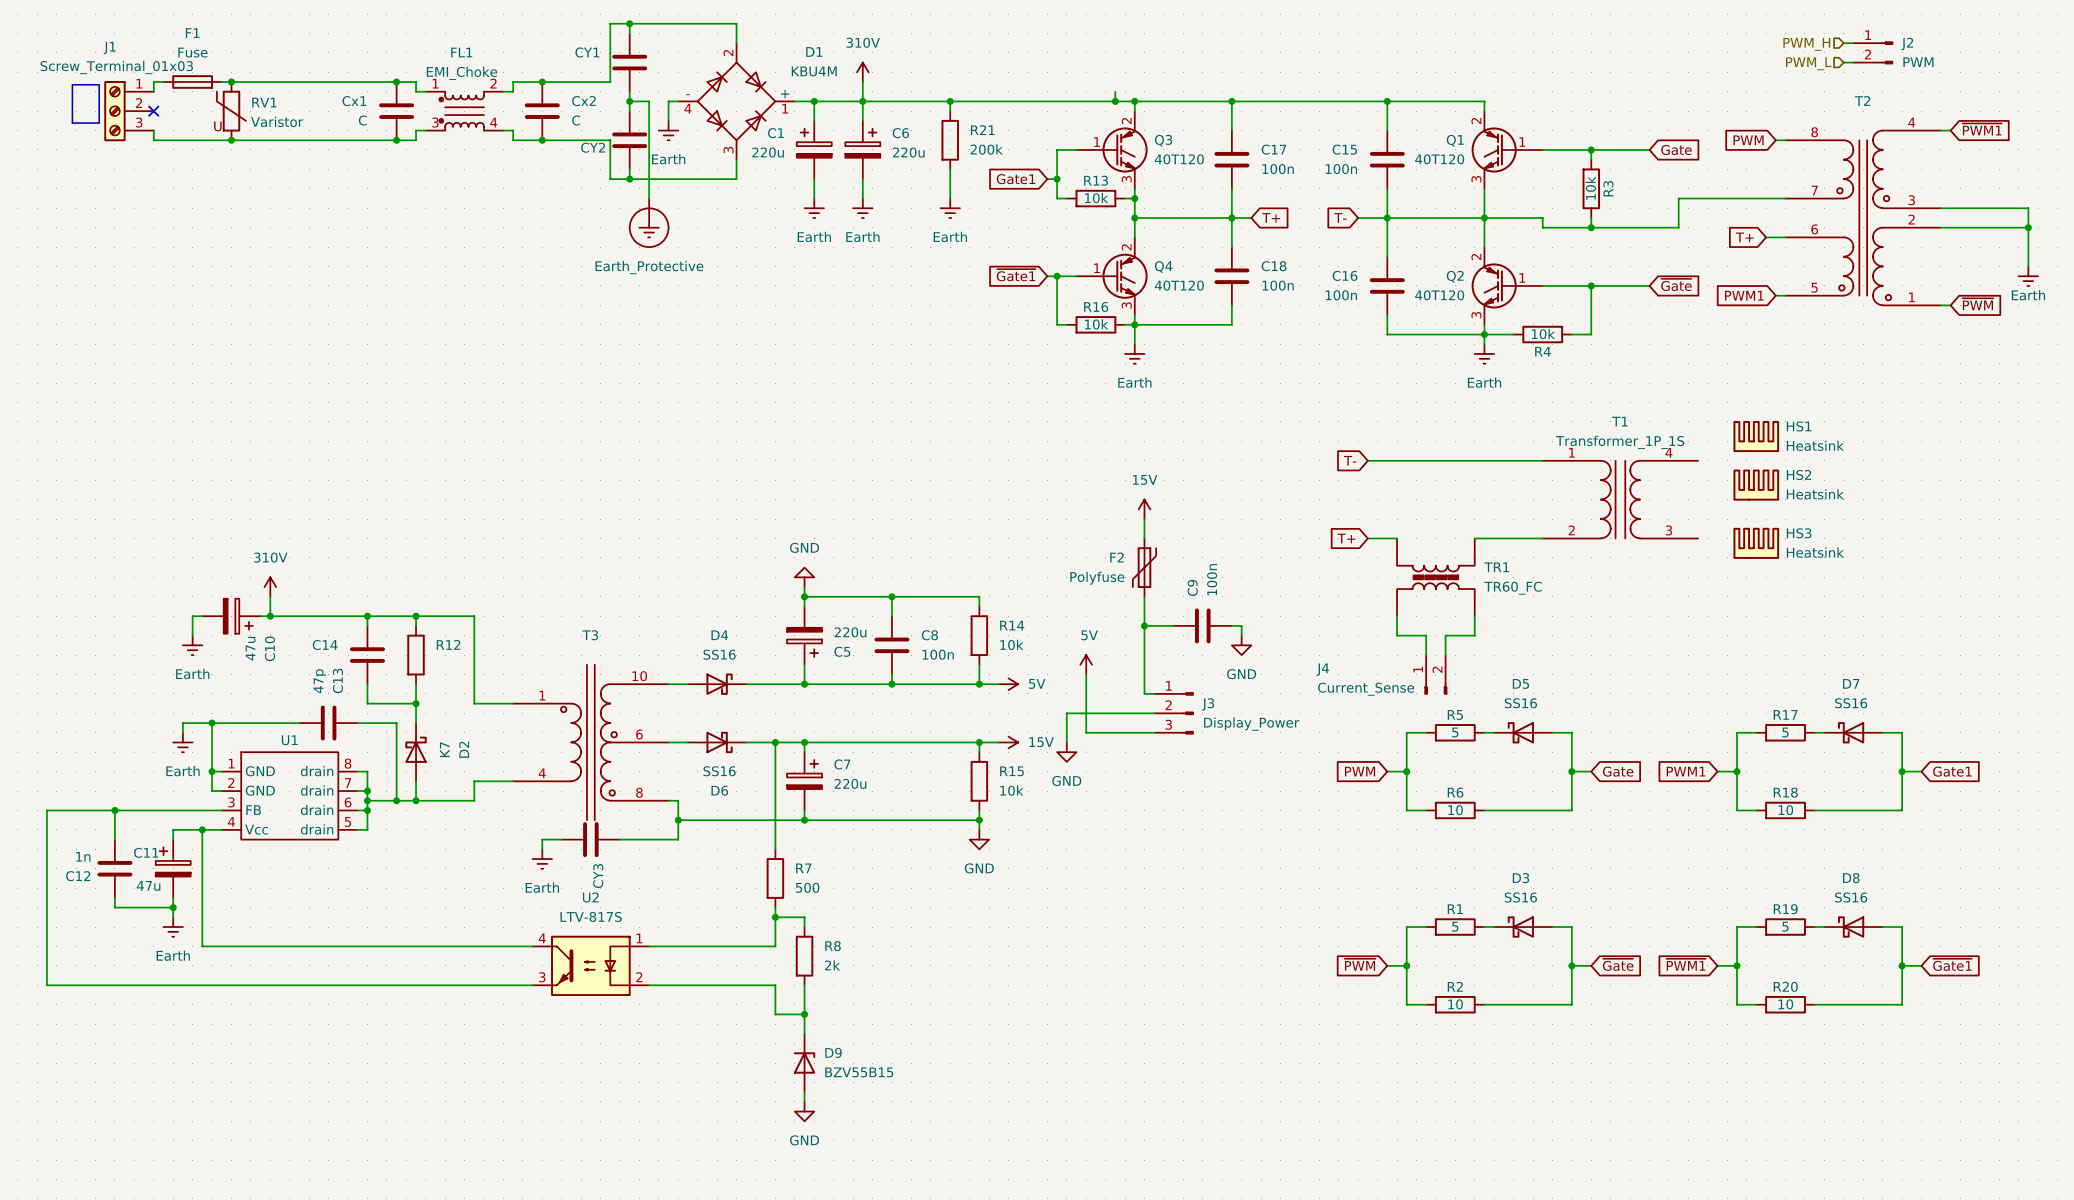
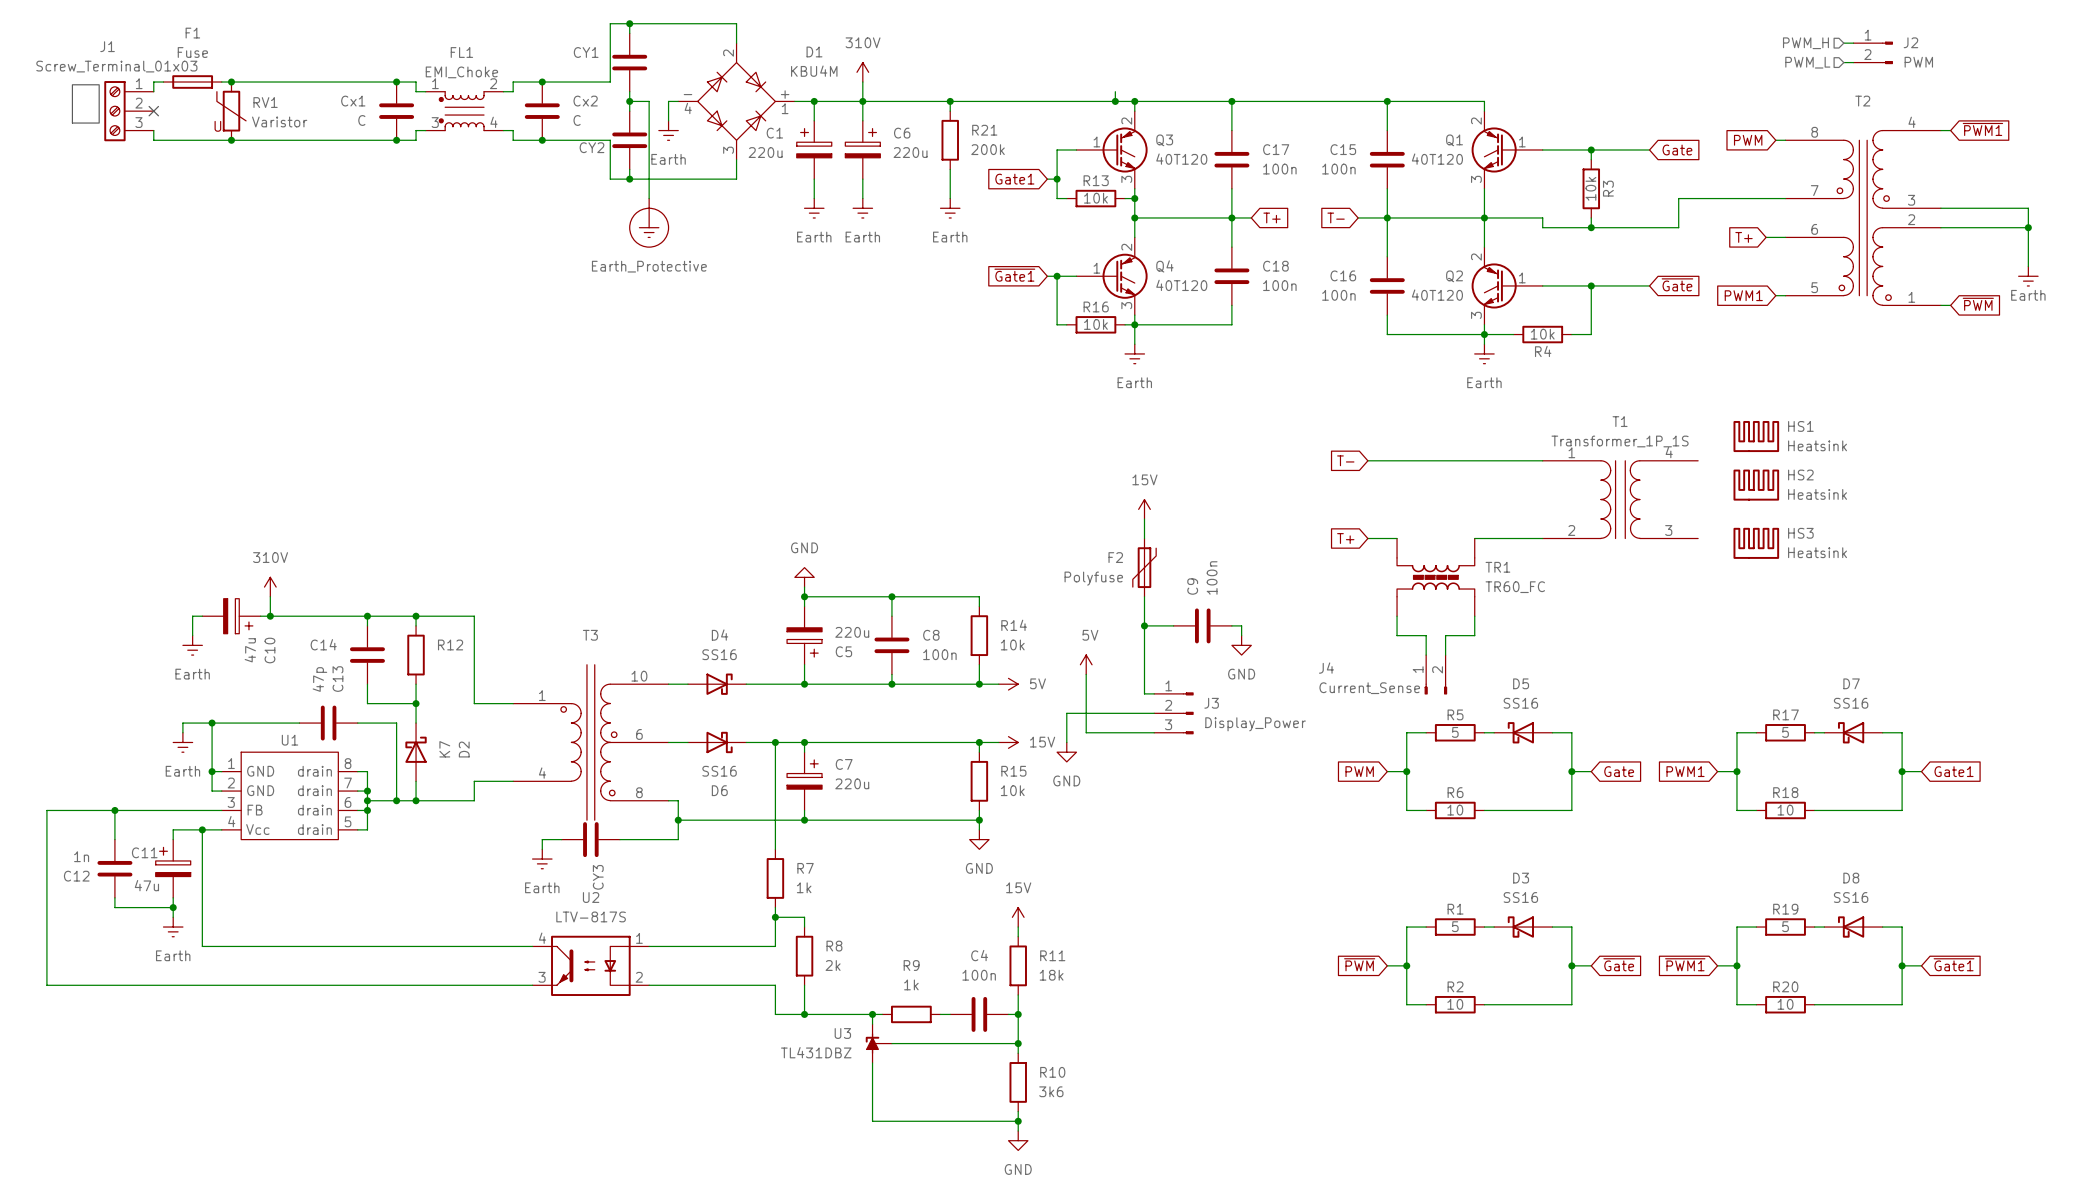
R7 value: 500 (807, 887) -> 1k (804, 887)
power symbol: none -> 15V (1018, 917)
wire: none -> (1018, 927) (1018, 936)
R11: none -> 18k (1018, 965)
wire: none -> (1018, 995) (1018, 1053)
wire: (804, 1014) (804, 1033) -> (804, 1014) (882, 1014)
junction: none -> (872, 1014)
R9: none -> 1k (911, 1014)
wire: none -> (940, 1014) (950, 1014)
C4: none -> 100n (979, 1014)
wire: none -> (1008, 1014) (1018, 1014)
junction: none -> (1018, 1014)
U3: none -> TL431DBZ (878, 1043)
wire: none -> (891, 1043) (1018, 1043)
junction: none -> (1018, 1043)
D9: BZV55B15 (804, 1063) -> none
wire: none -> (872, 1063) (872, 1121) (1018, 1121)
R10: none -> 3k6 (1018, 1082)
wire: (804, 1092) (804, 1101) -> (872, 1014) (872, 1024)
power symbol: GND (804, 1111) -> none
wire: none -> (1018, 1111) (1018, 1130)
junction: none -> (1018, 1121)
power symbol: none -> GND (1018, 1140)

